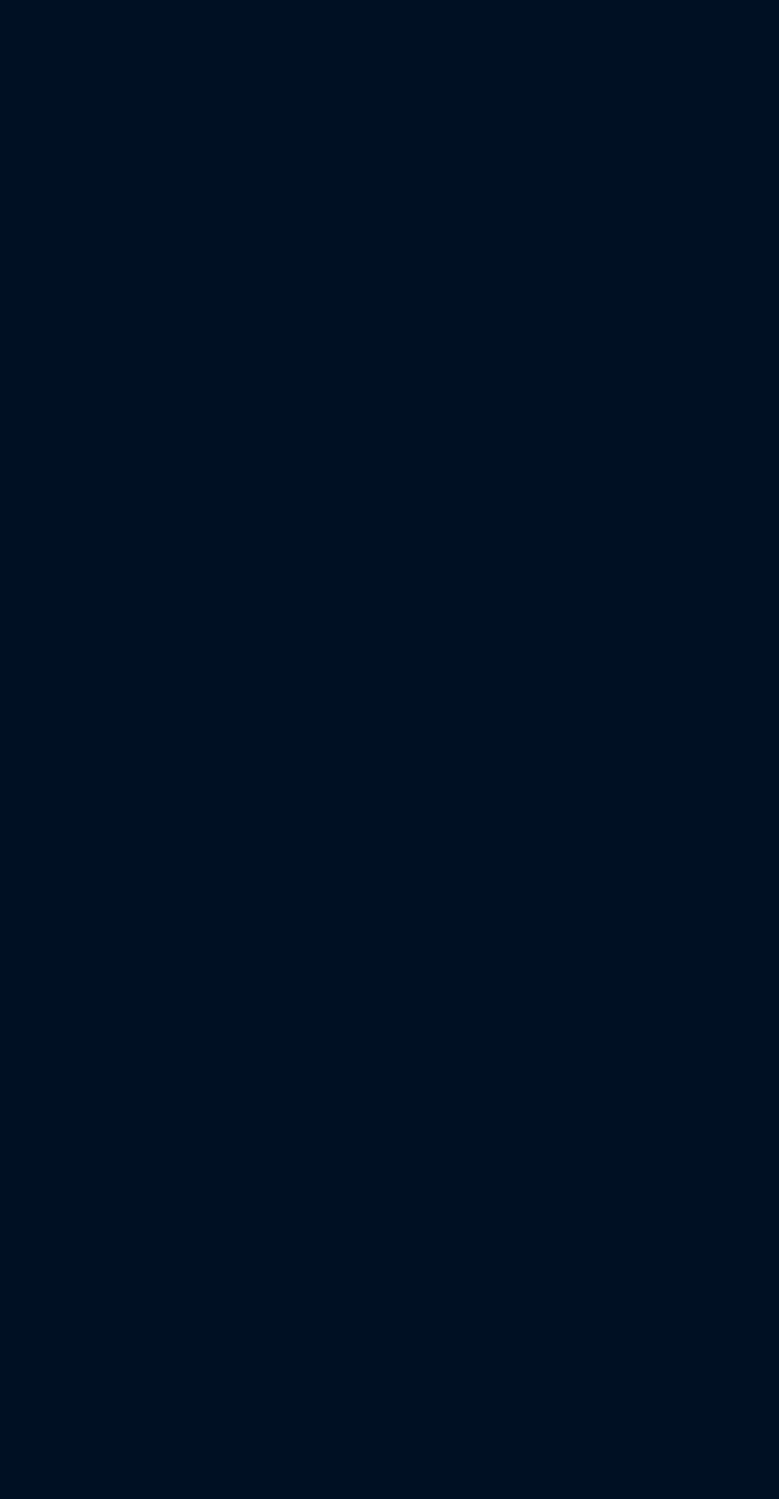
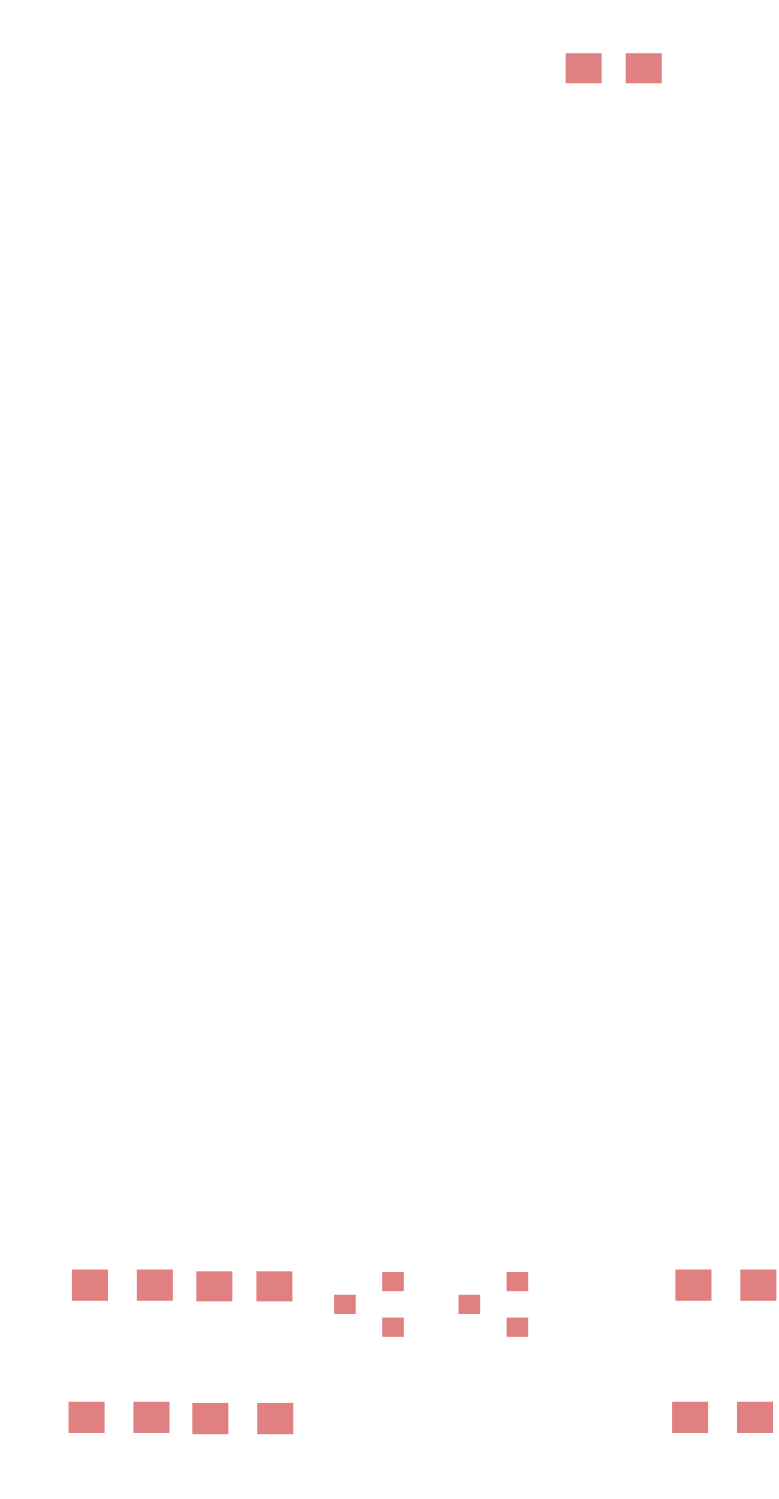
part: none -> (613, 68)
part: none -> (122, 1285)
part: none -> (725, 1285)
part: none -> (244, 1286)
part: none -> (368, 1304)
part: none -> (493, 1304)
part: none -> (119, 1417)
part: none -> (722, 1417)
part: none -> (242, 1418)

